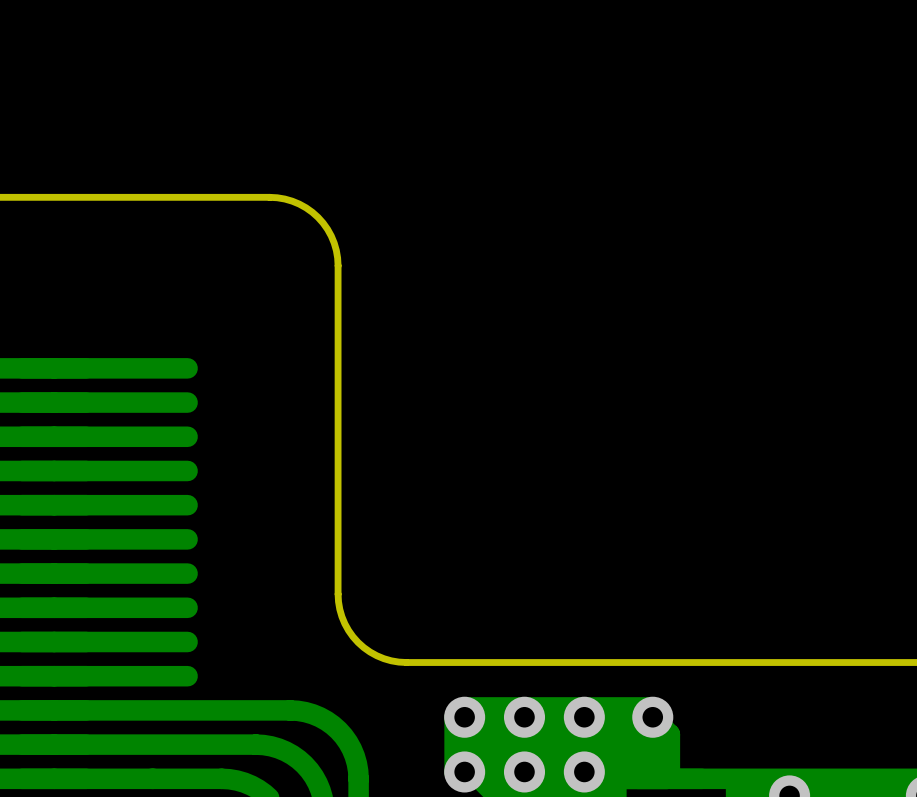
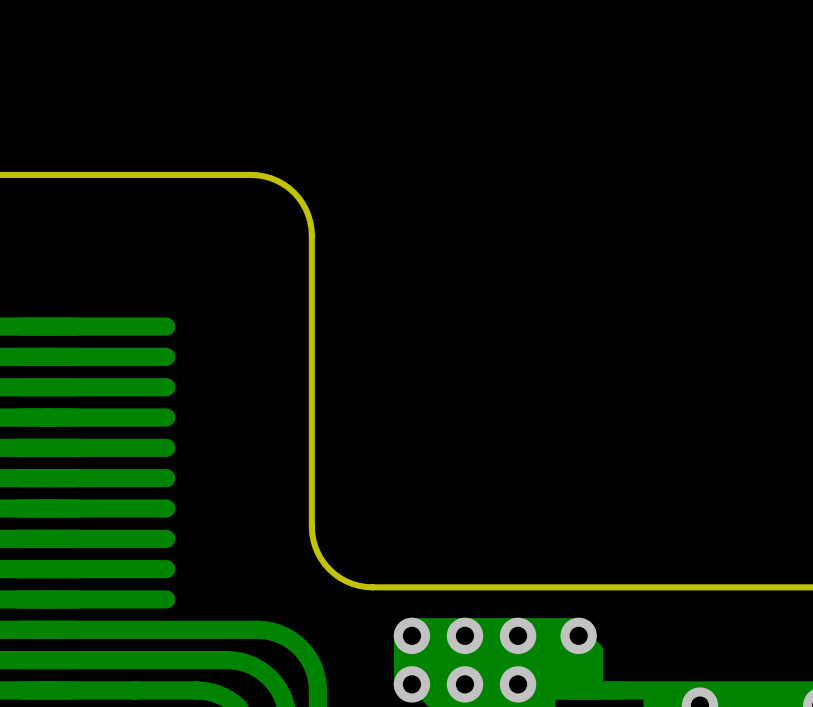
board edge: (269, 197) (292, 201) (312, 212) (327, 229) (336, 250) (338, 265) (338, 594) (341, 616) (353, 636) (370, 652) (391, 660) (420, 662) -> (239, 174) (264, 176) (283, 184) (298, 197) (308, 215) (311, 235) (313, 540) (321, 558) (334, 574) (352, 583) (372, 587)

